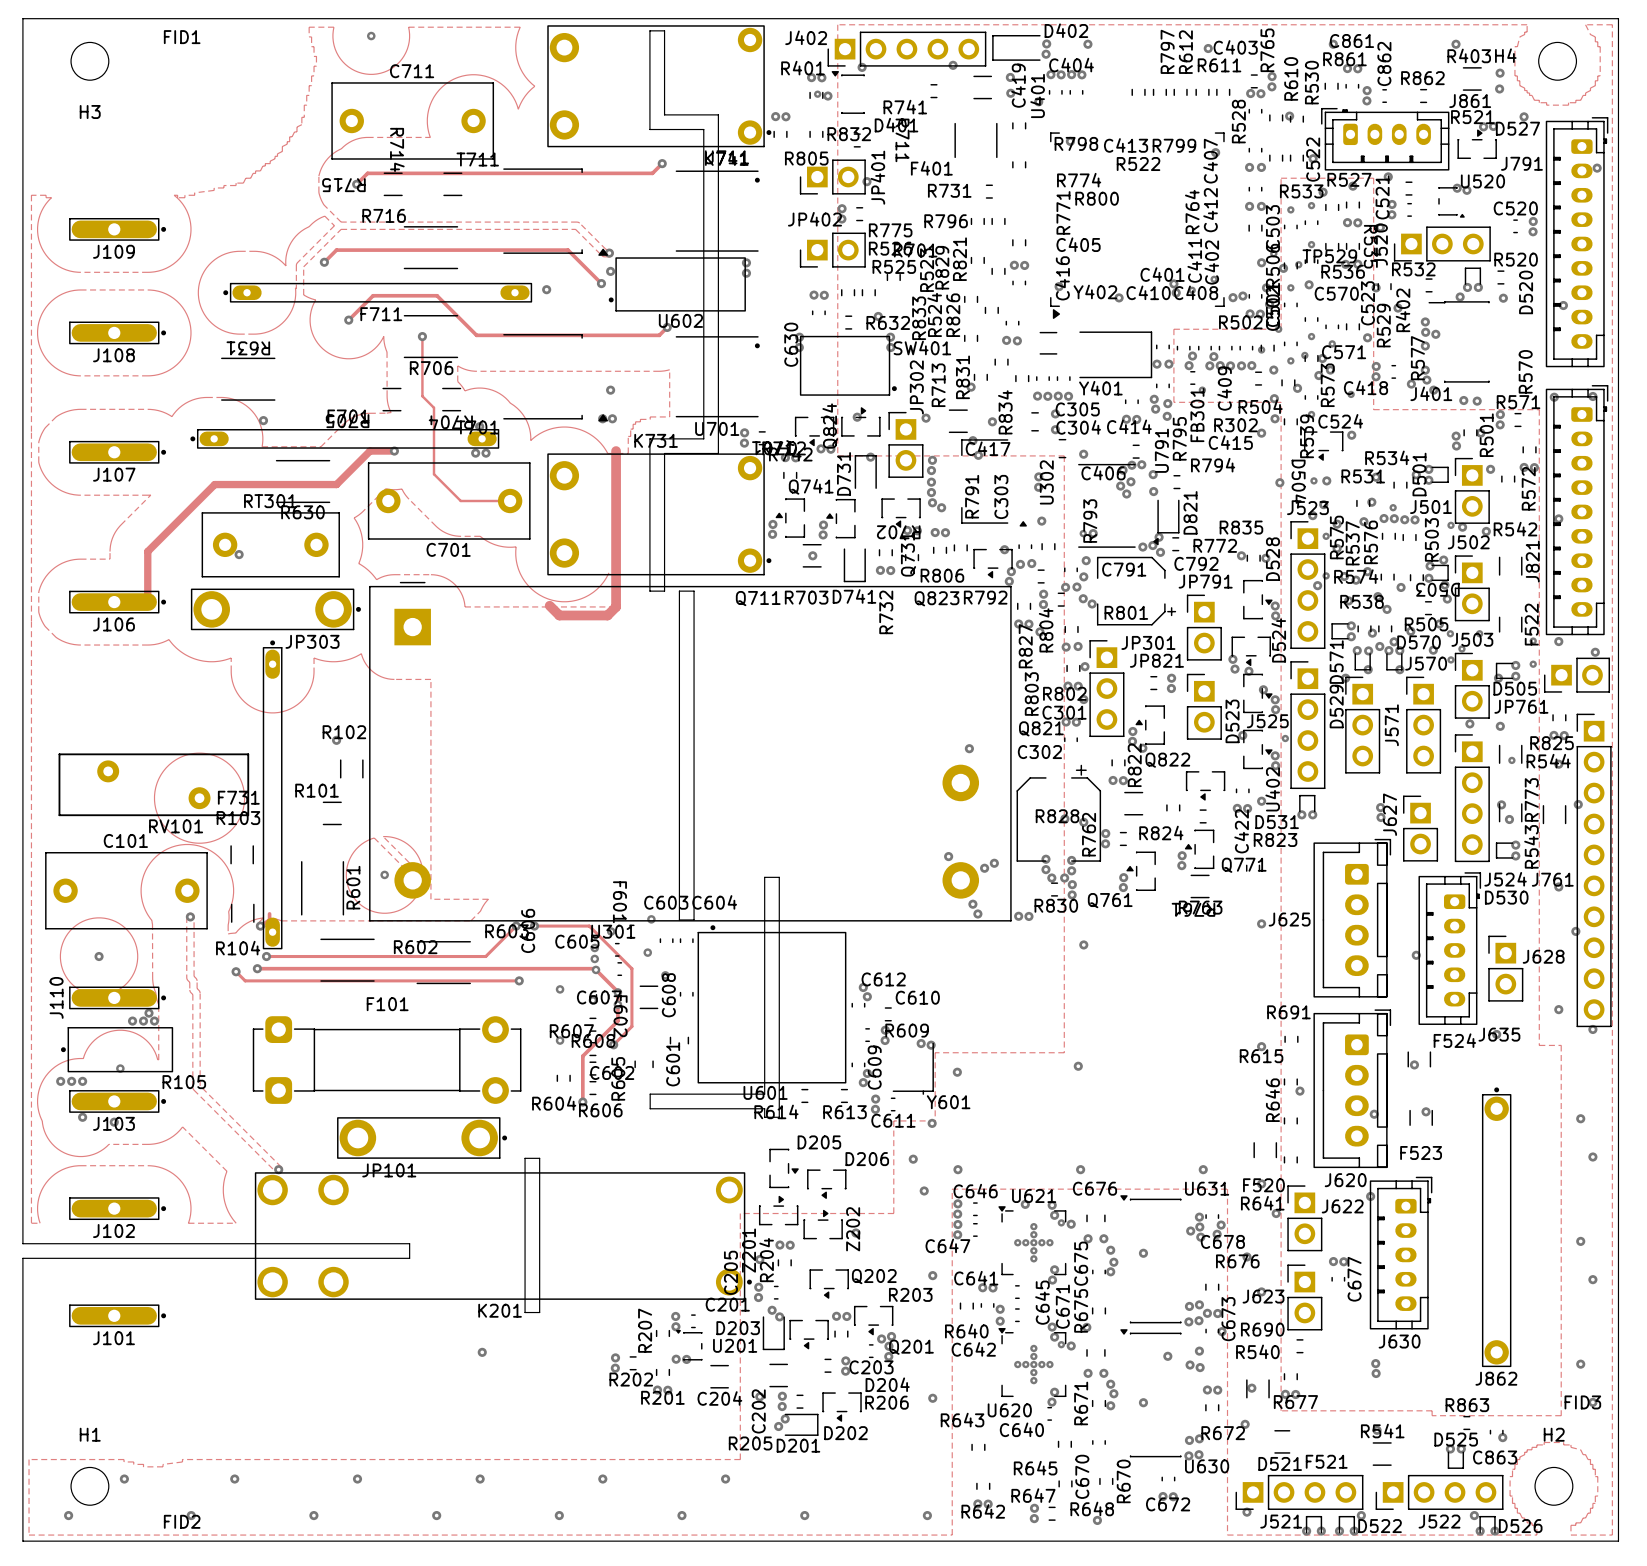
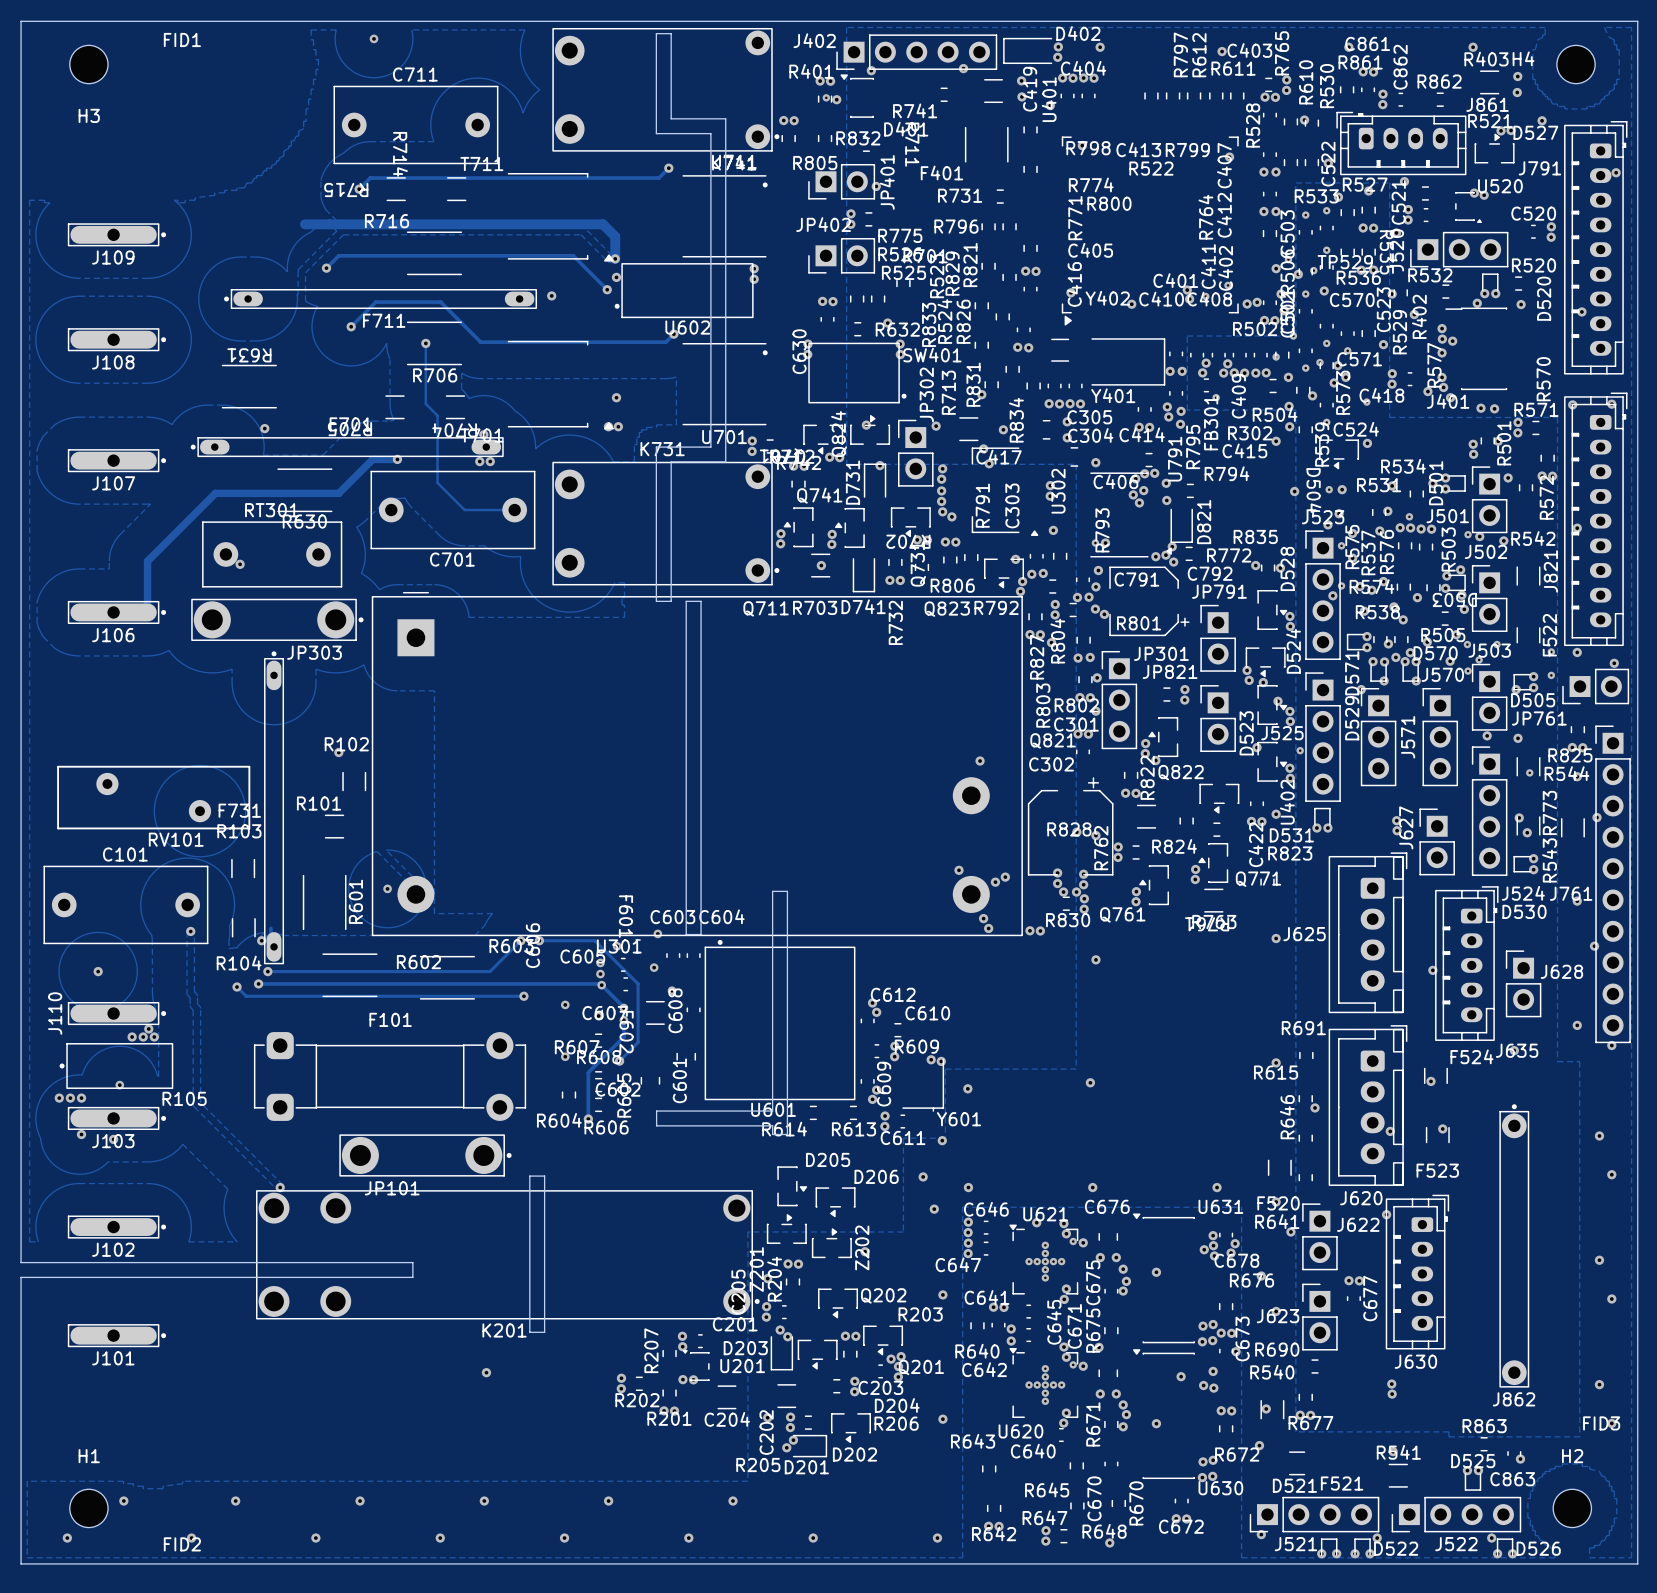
track: none -> (304, 224) (602, 224) (615, 236) (615, 258)
track: (616, 451) (616, 606) (607, 615) (559, 615) (549, 605) -> none

